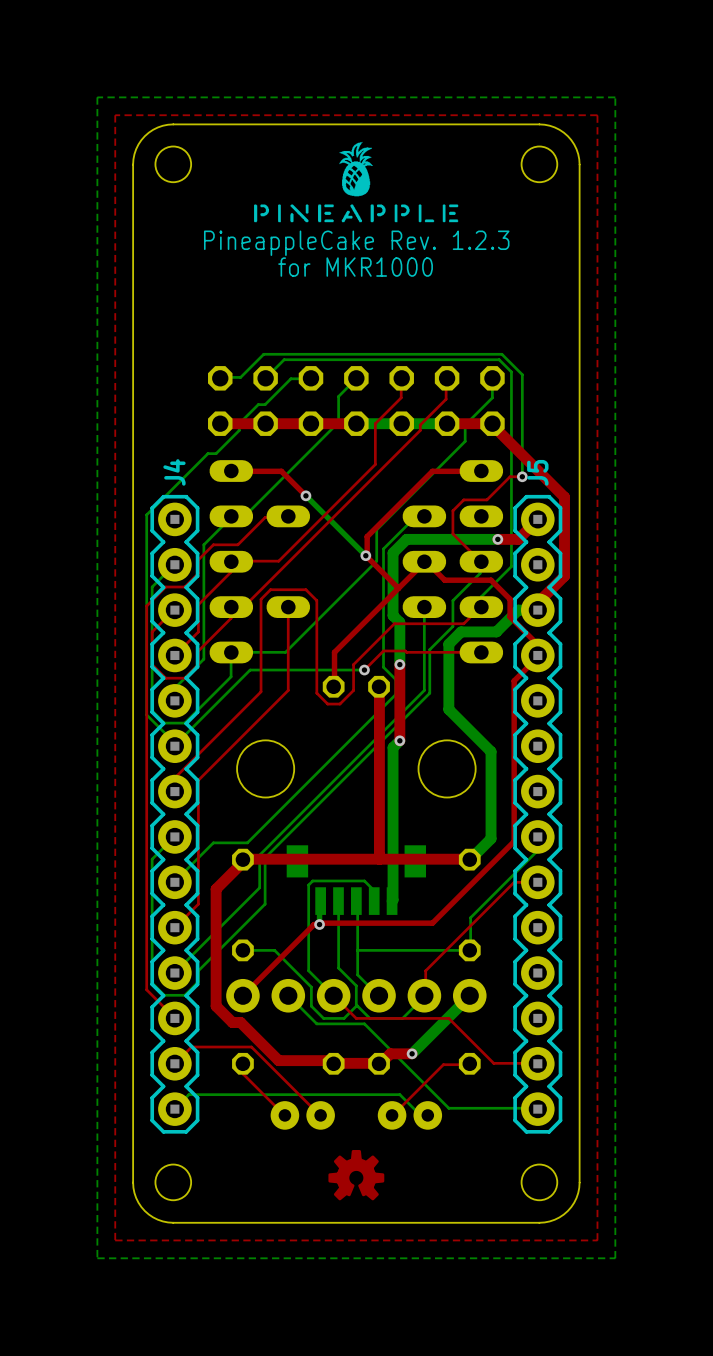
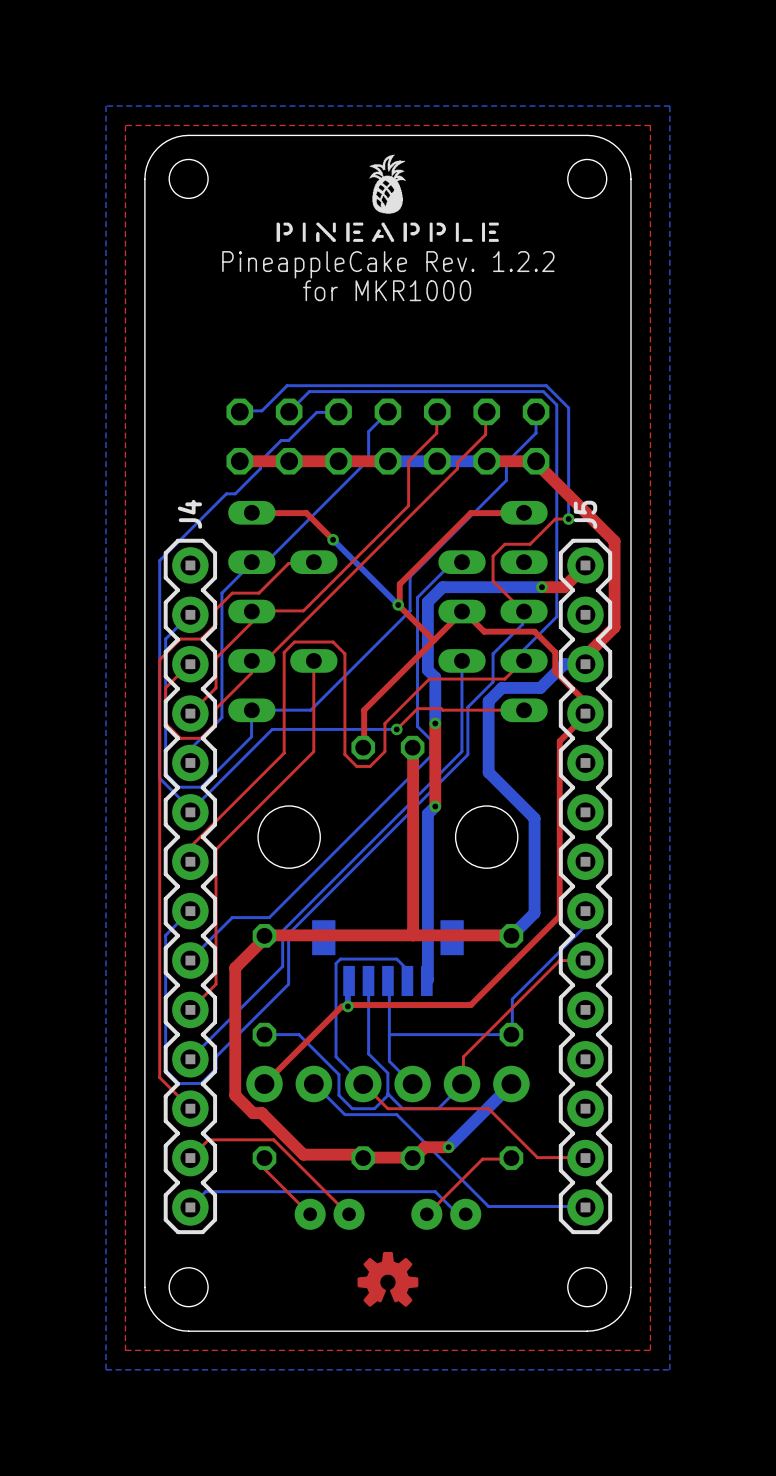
text: PineappleCake Rev. 1.2.3 (356, 243) -> PineappleCake Rev. 1.2.2 (388, 264)

